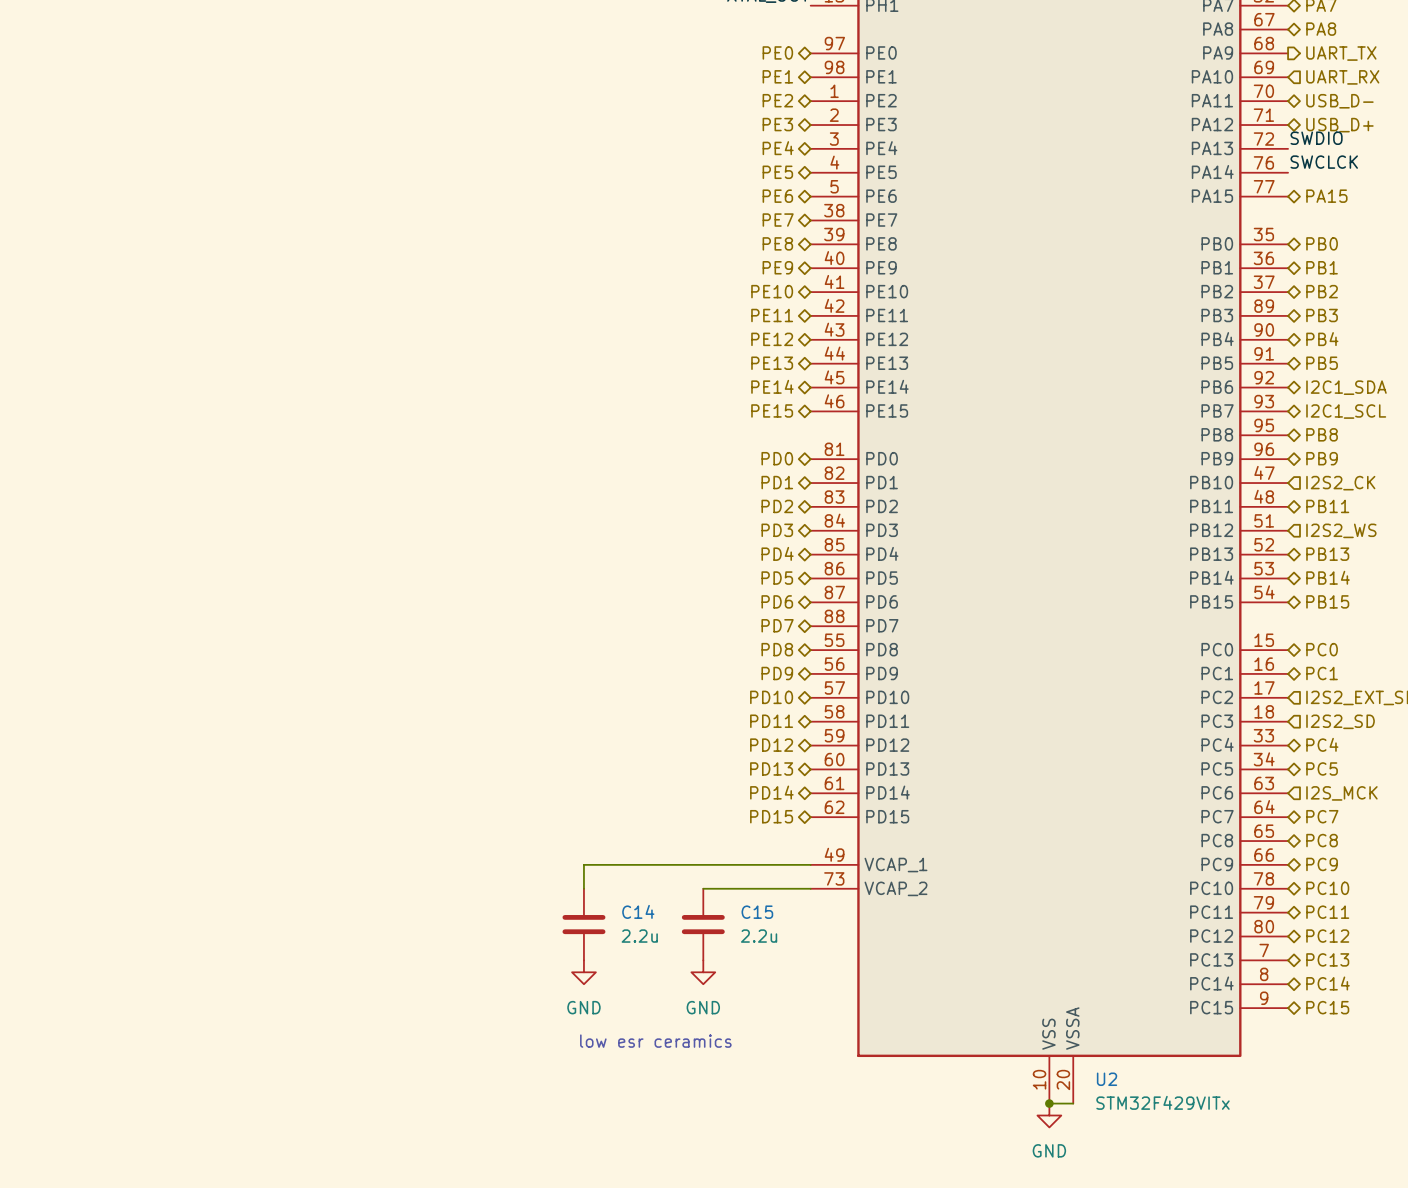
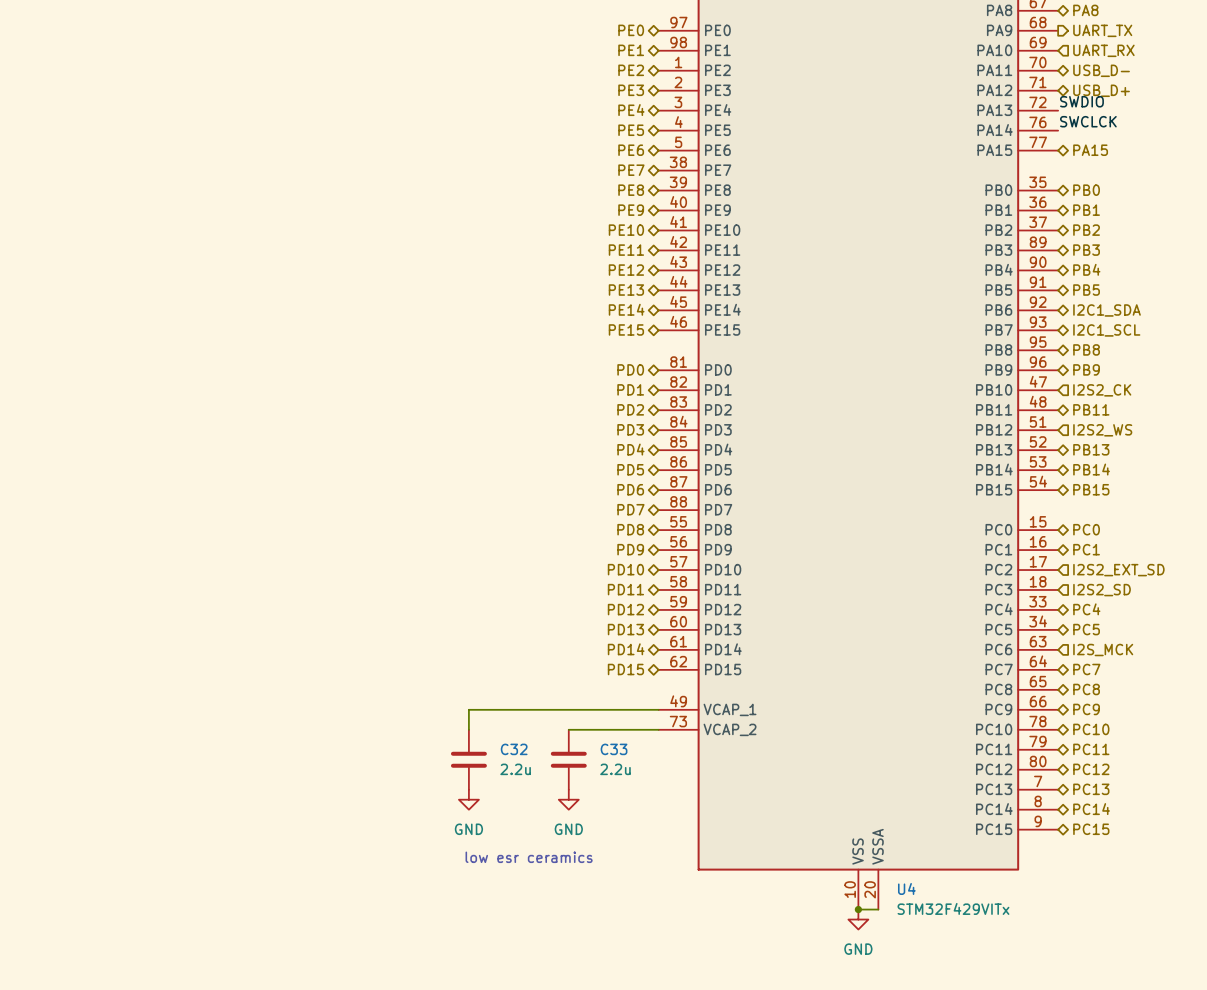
C14 name: C14 (638, 911) -> C32 (514, 749)
C15 name: C15 (757, 912) -> C33 (614, 749)
U2 name: U2 (1107, 1079) -> U4 (906, 888)

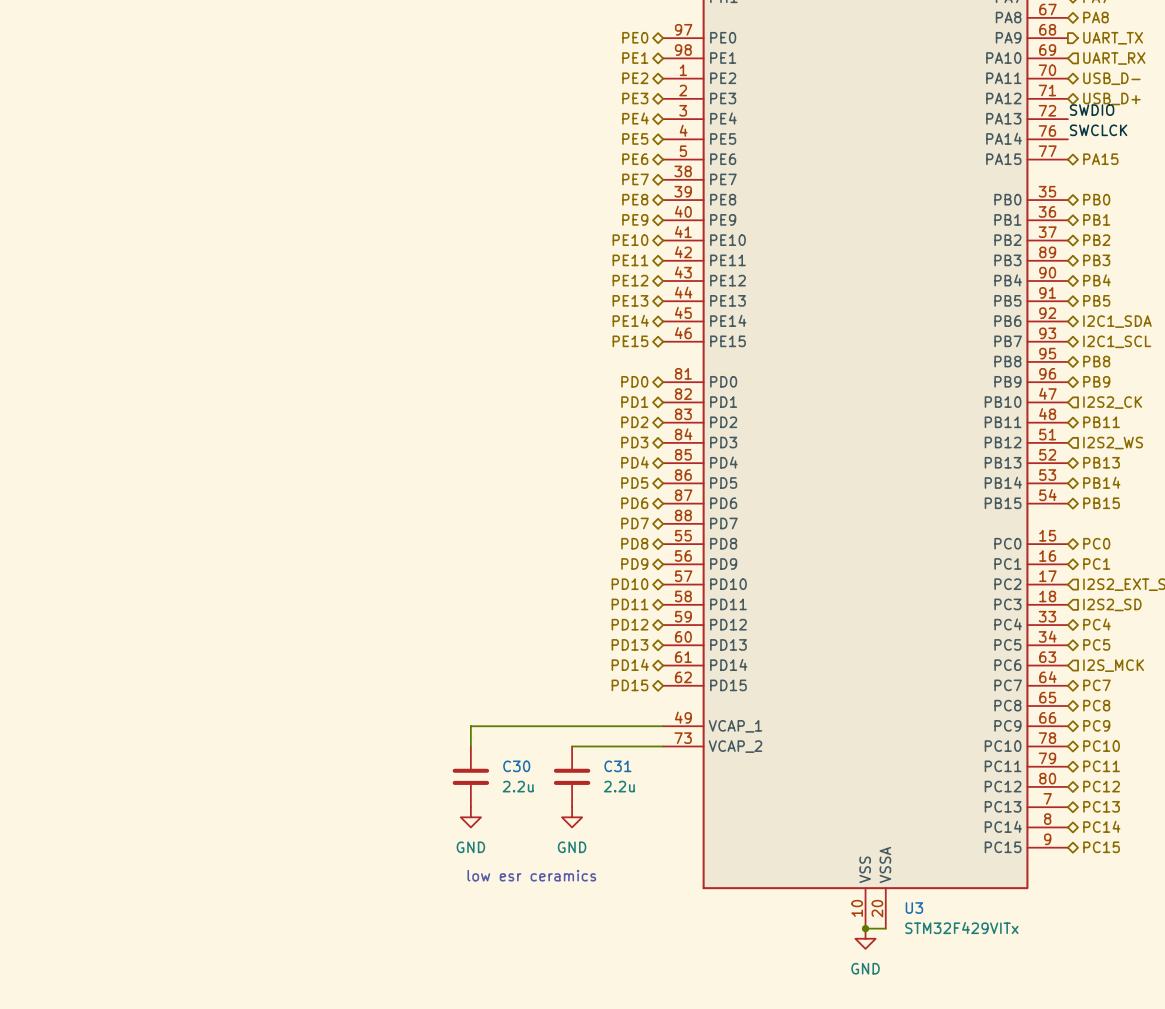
C32 name: C32 (514, 749) -> C30 (516, 766)
C33 name: C33 (614, 749) -> C31 (617, 766)
U4 name: U4 (906, 888) -> U3 (914, 908)

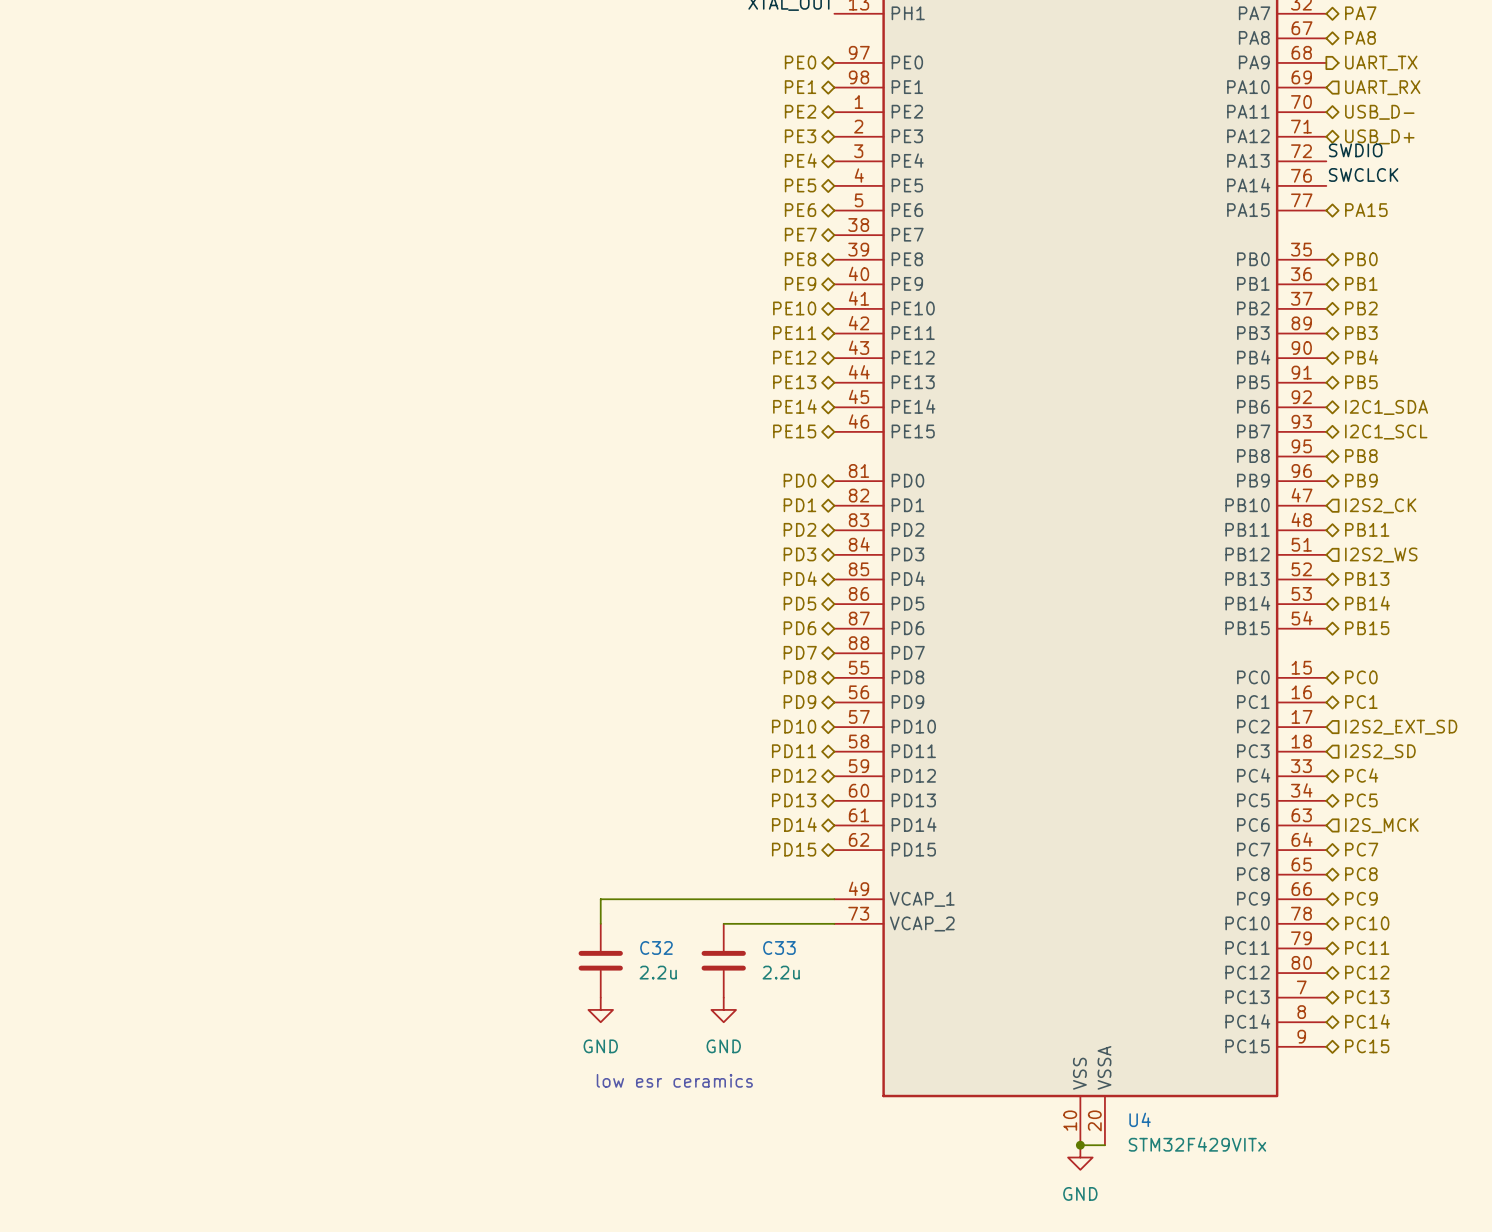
C30 name: C30 (516, 766) -> C32 (656, 947)
C31 name: C31 (617, 766) -> C33 (779, 947)
U3 name: U3 (914, 908) -> U4 (1140, 1119)

